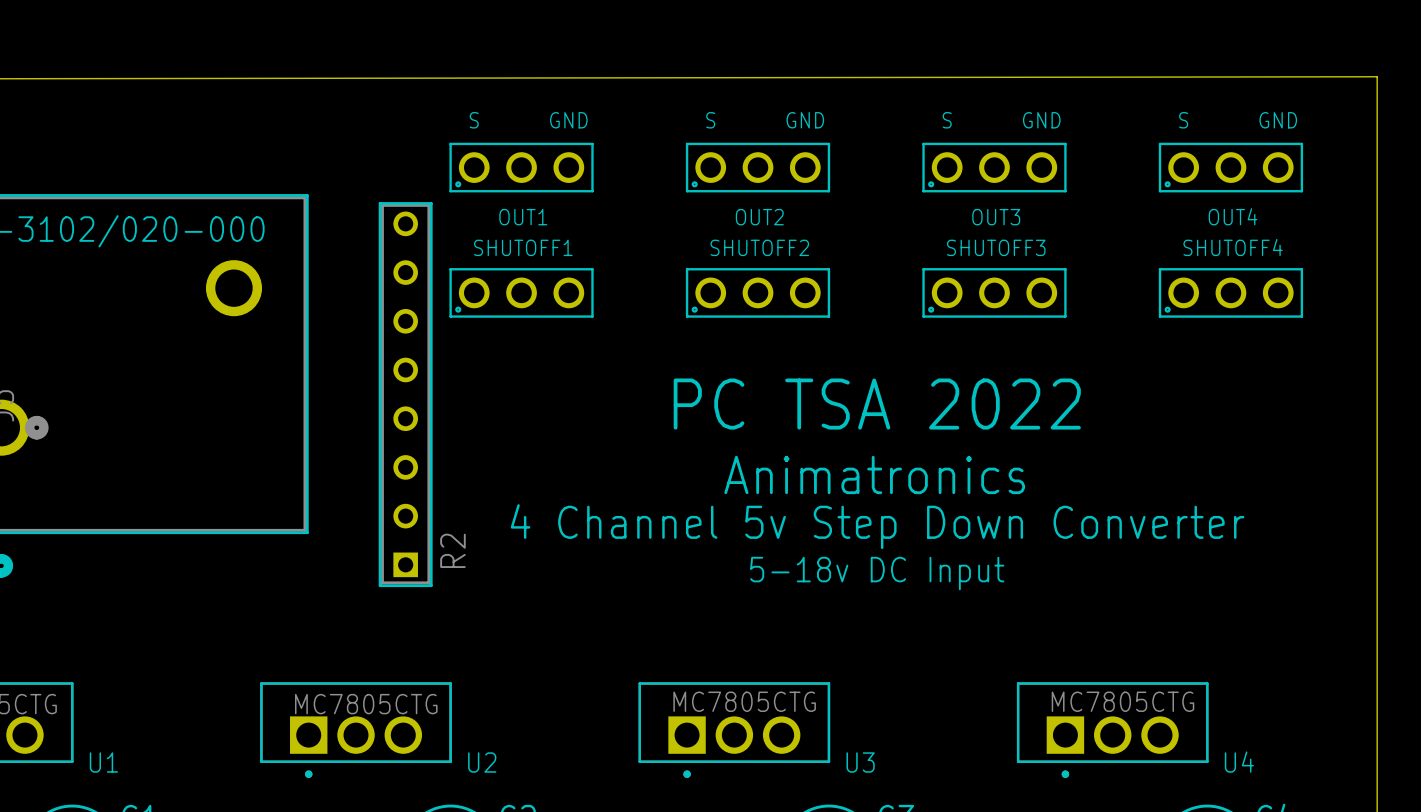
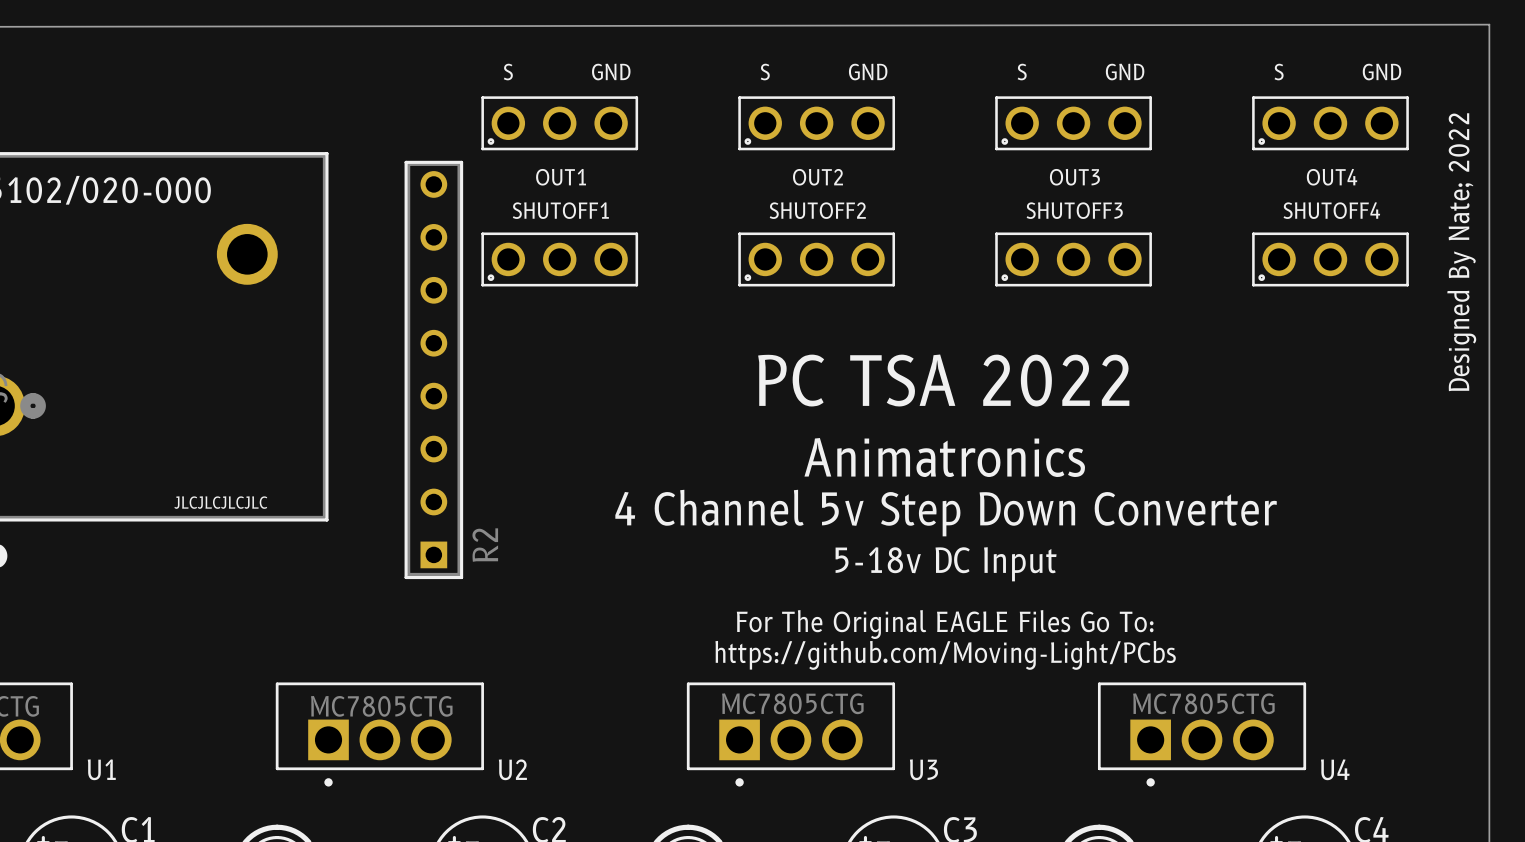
text: none -> Designed By Nate; 2022 (1461, 252)
text: none -> JLCJLCJLCJLC (220, 502)
text: none -> For The Original EAGLE Files Go To: (945, 624)
text: none -> https://github.com/Moving-Light/PCbs (945, 655)

